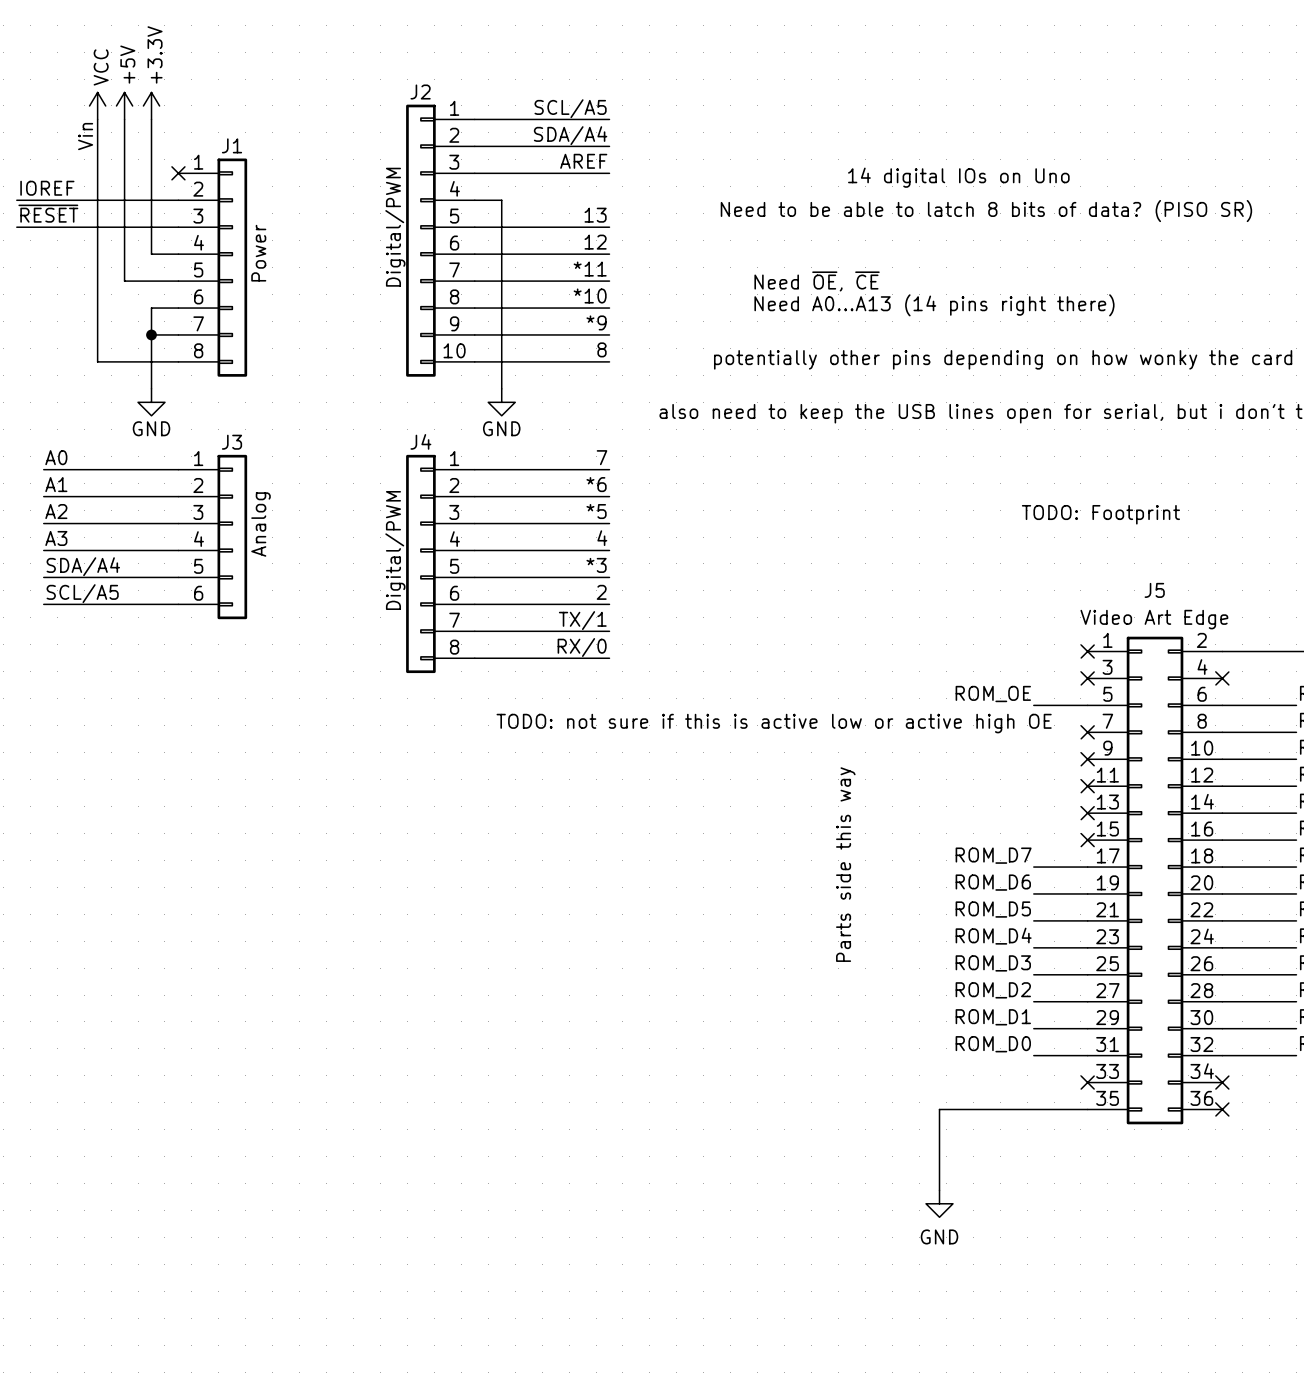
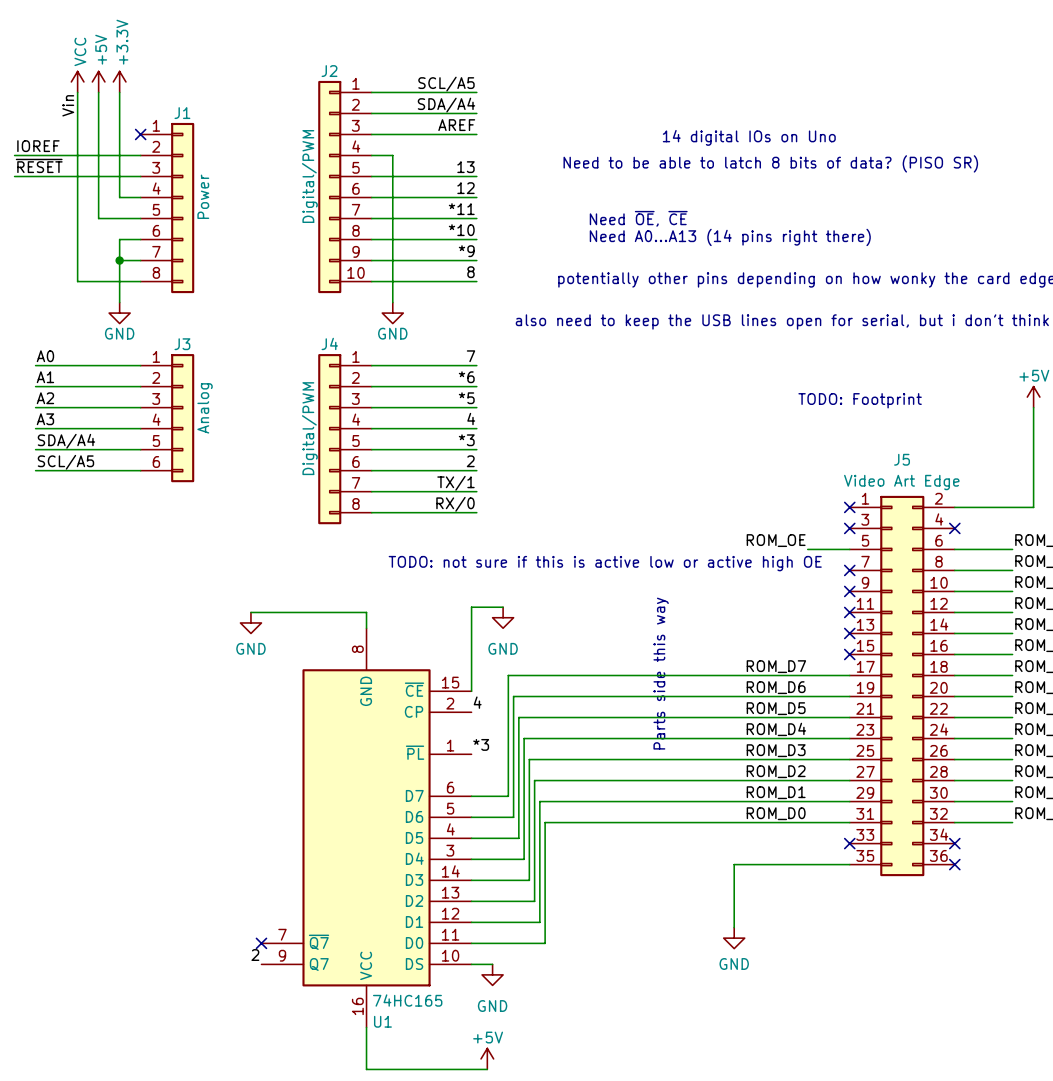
wire: none -> (503, 607) (471, 607) (471, 691)
wire: none -> (250, 612) (366, 612) (366, 628)
power symbol: none -> GND (503, 617)
power symbol: none -> GND (250, 622)
wire: none -> (807, 675) (508, 675) (508, 796) (471, 796)
wire: none -> (807, 696) (513, 696) (513, 817) (471, 817)
label: none -> 4 (477, 702)
wire: none -> (807, 717) (518, 717) (518, 838) (471, 838)
wire: none -> (807, 738) (524, 738) (524, 859) (471, 859)
label: none -> *3 (481, 744)
wire: none -> (807, 759) (529, 759) (529, 880) (471, 880)
wire: none -> (807, 780) (534, 780) (534, 901) (471, 901)
wire: none -> (807, 801) (539, 801) (539, 922) (471, 922)
wire: none -> (807, 822) (545, 822) (545, 943) (471, 943)
U1: none -> 74HC165 (366, 827)
no-connect mark: none -> (261, 943)
label: none -> 2 (255, 955)
wire: none -> (471, 964) (492, 964)
power symbol: none -> GND (492, 974)
wire: none -> (366, 1027) (366, 1069) (487, 1069)
power symbol: none -> +5V (487, 1058)

